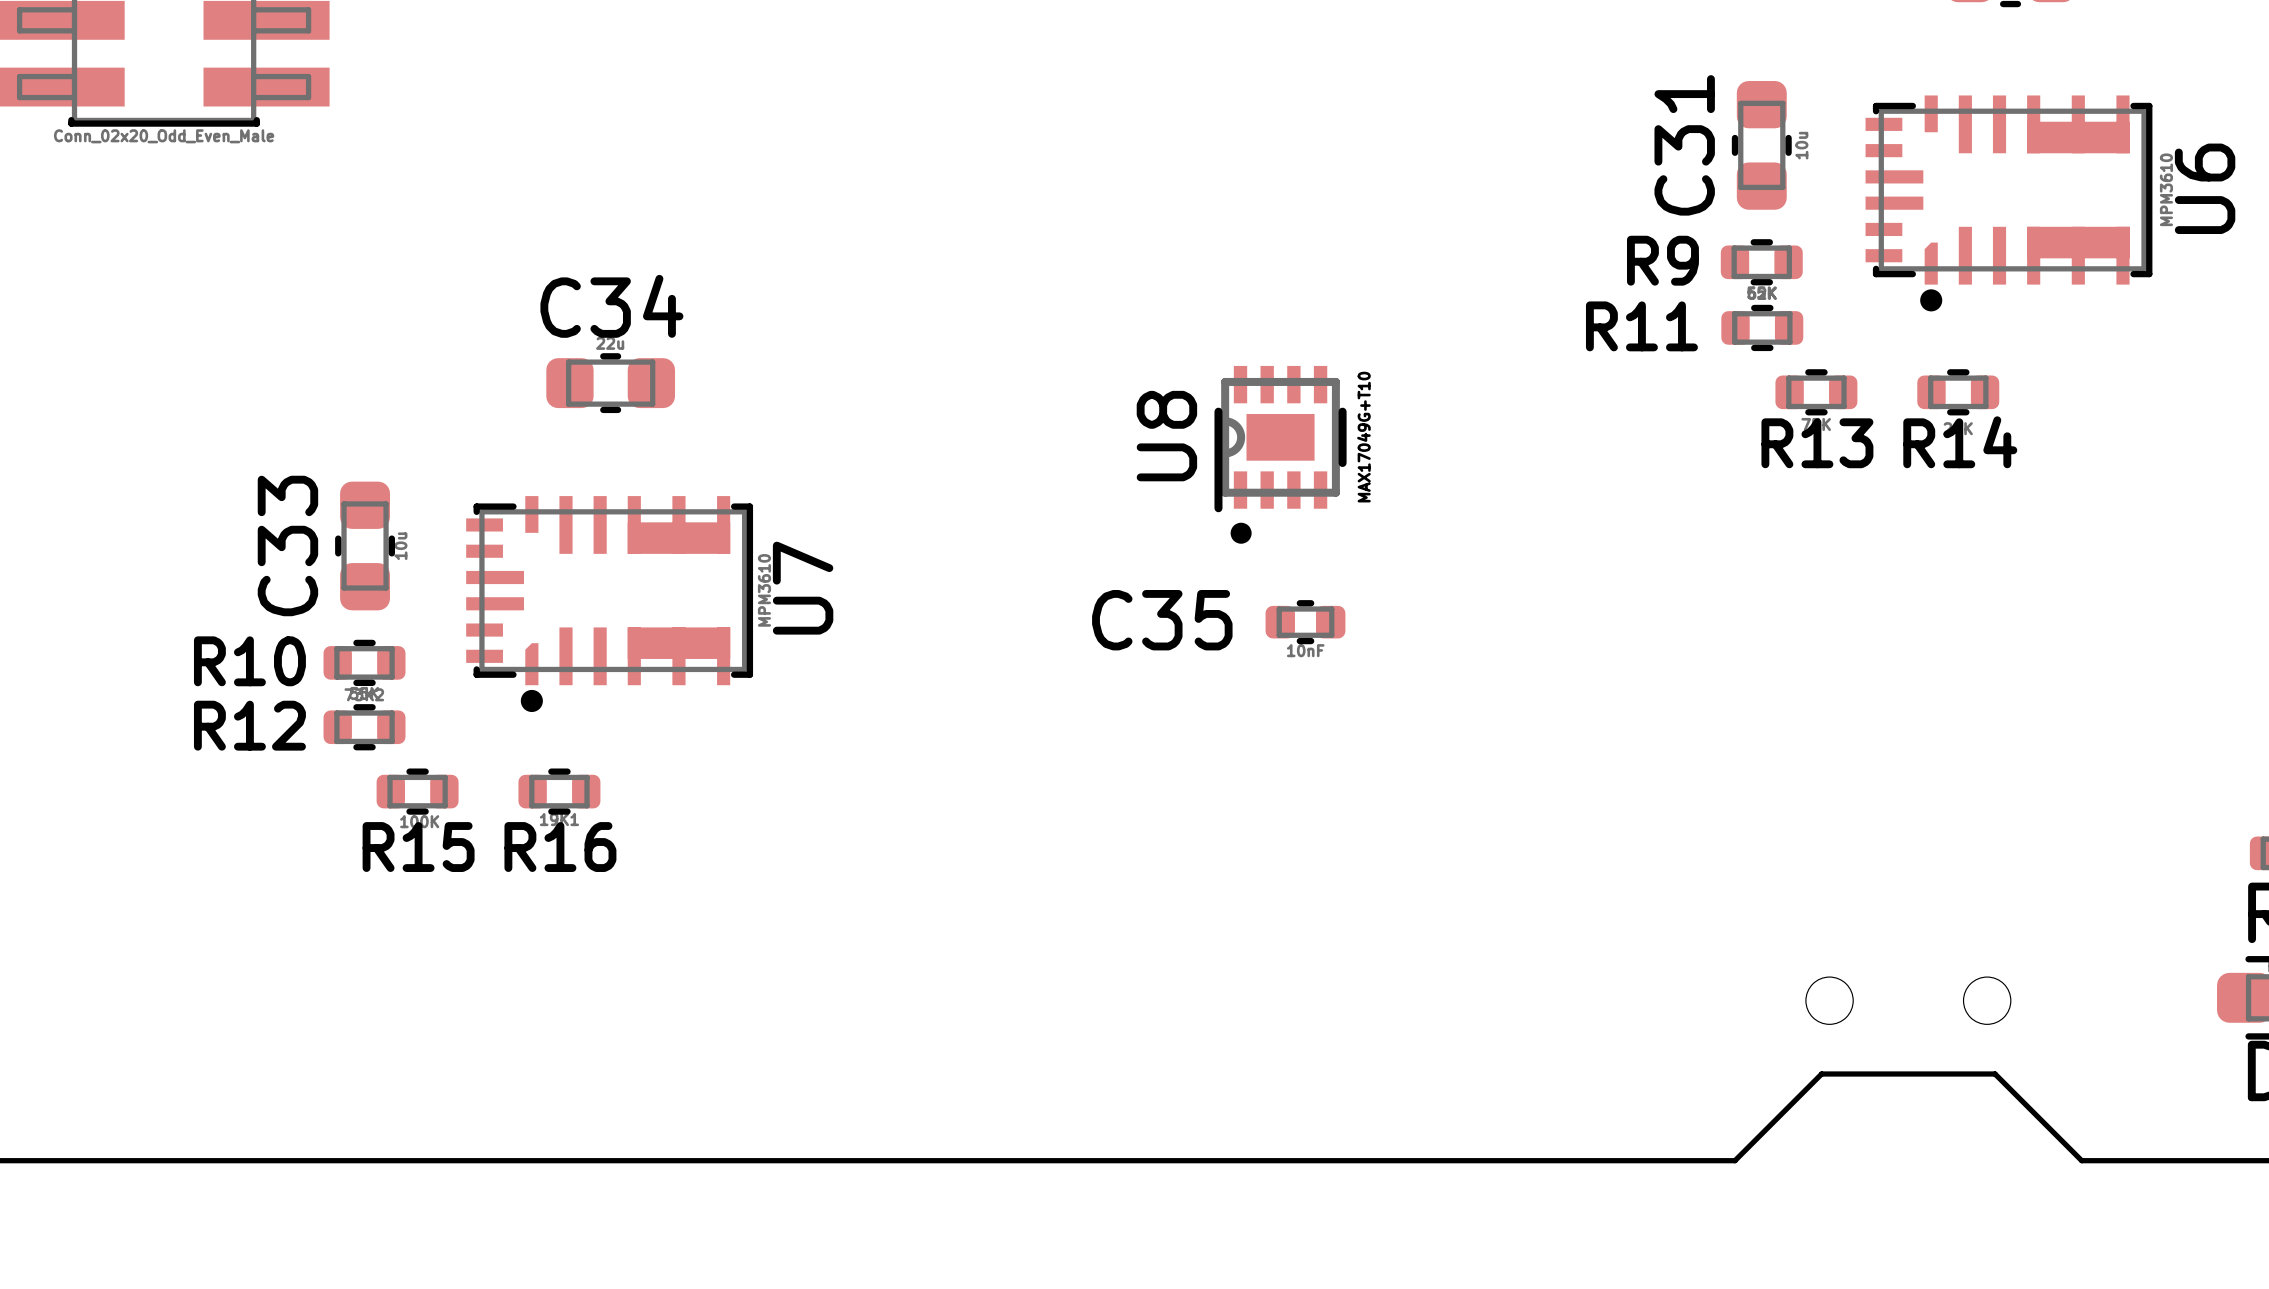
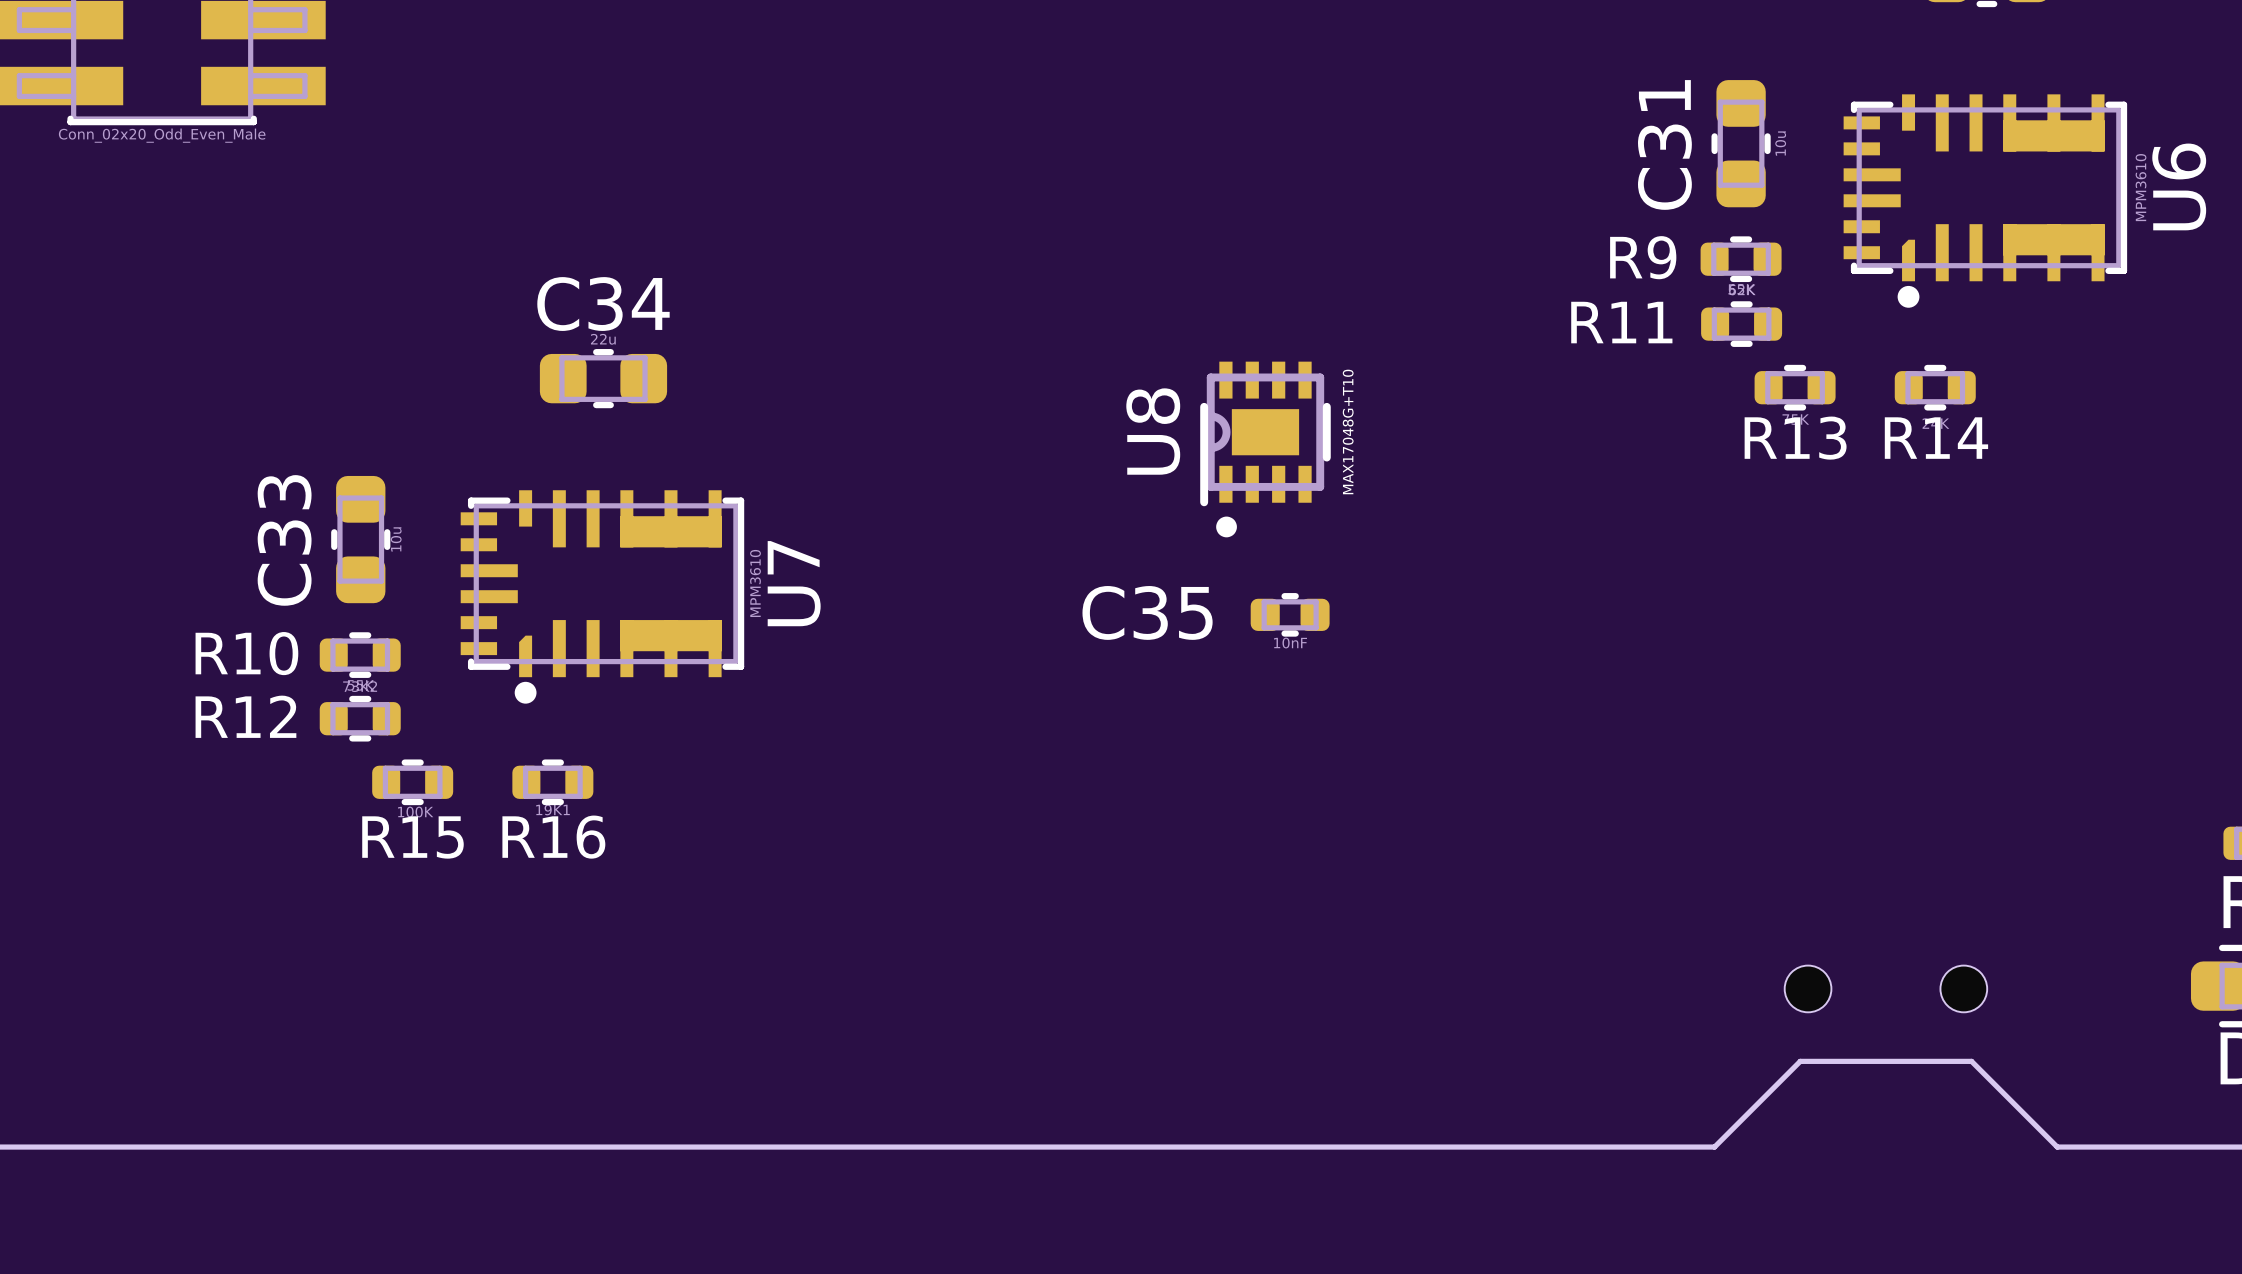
U8 value: MAX17049G+T10 (1363, 437) -> MAX17048G+T10 (1348, 431)

